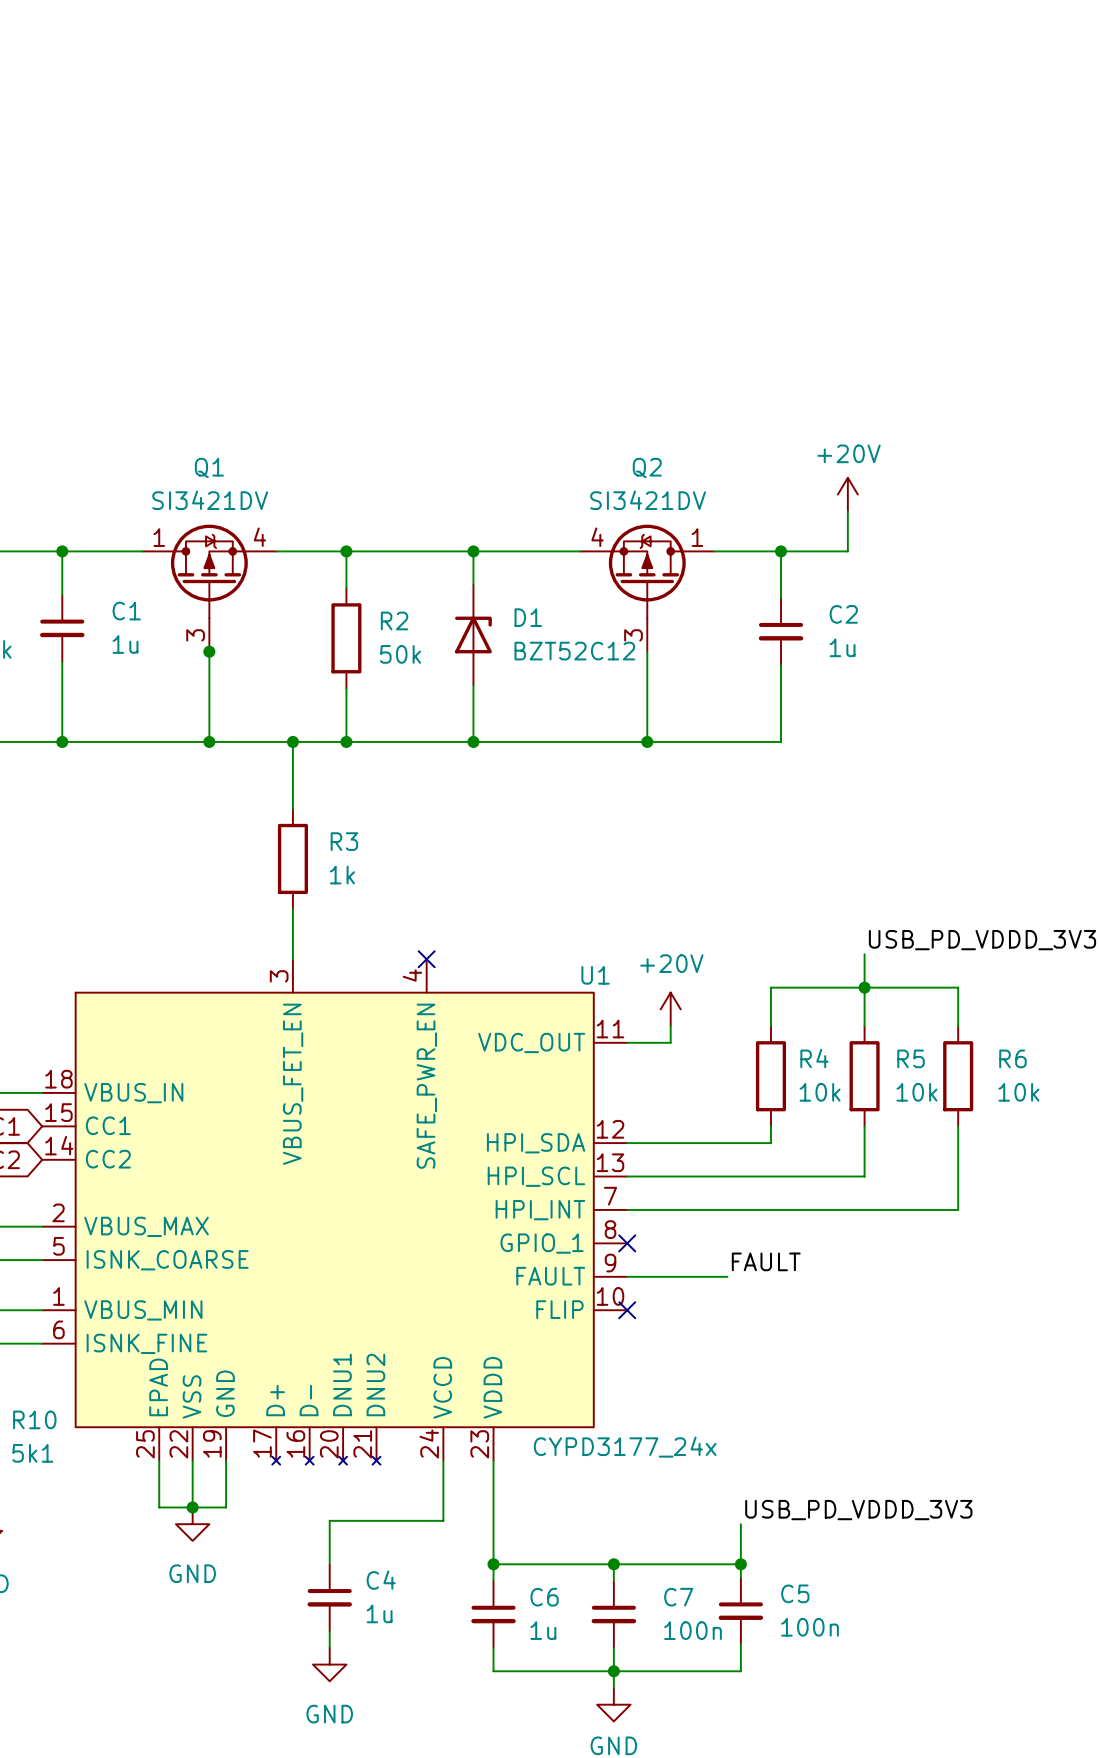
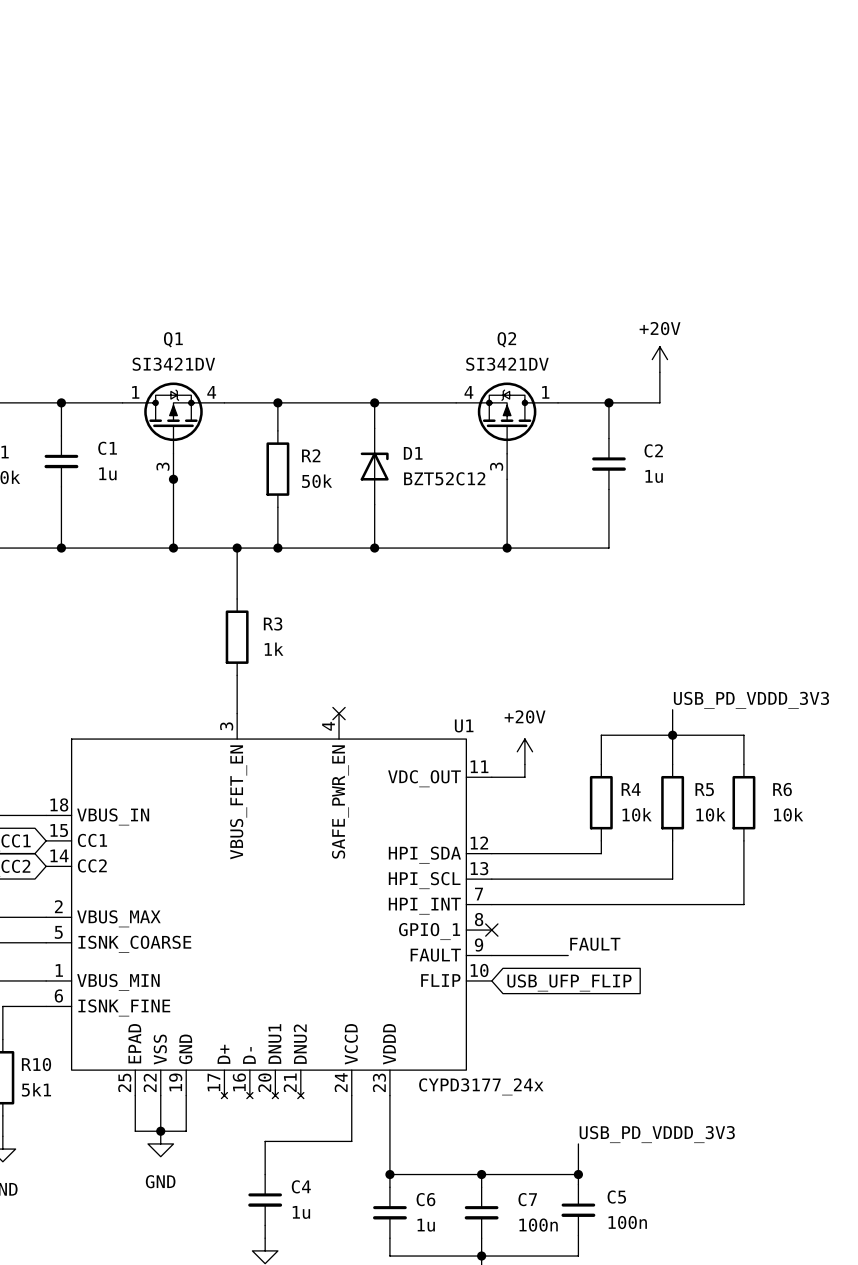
no-connect mark: (627, 1310) -> none
global label: none -> USB_UFP_FLIP (569, 982)

